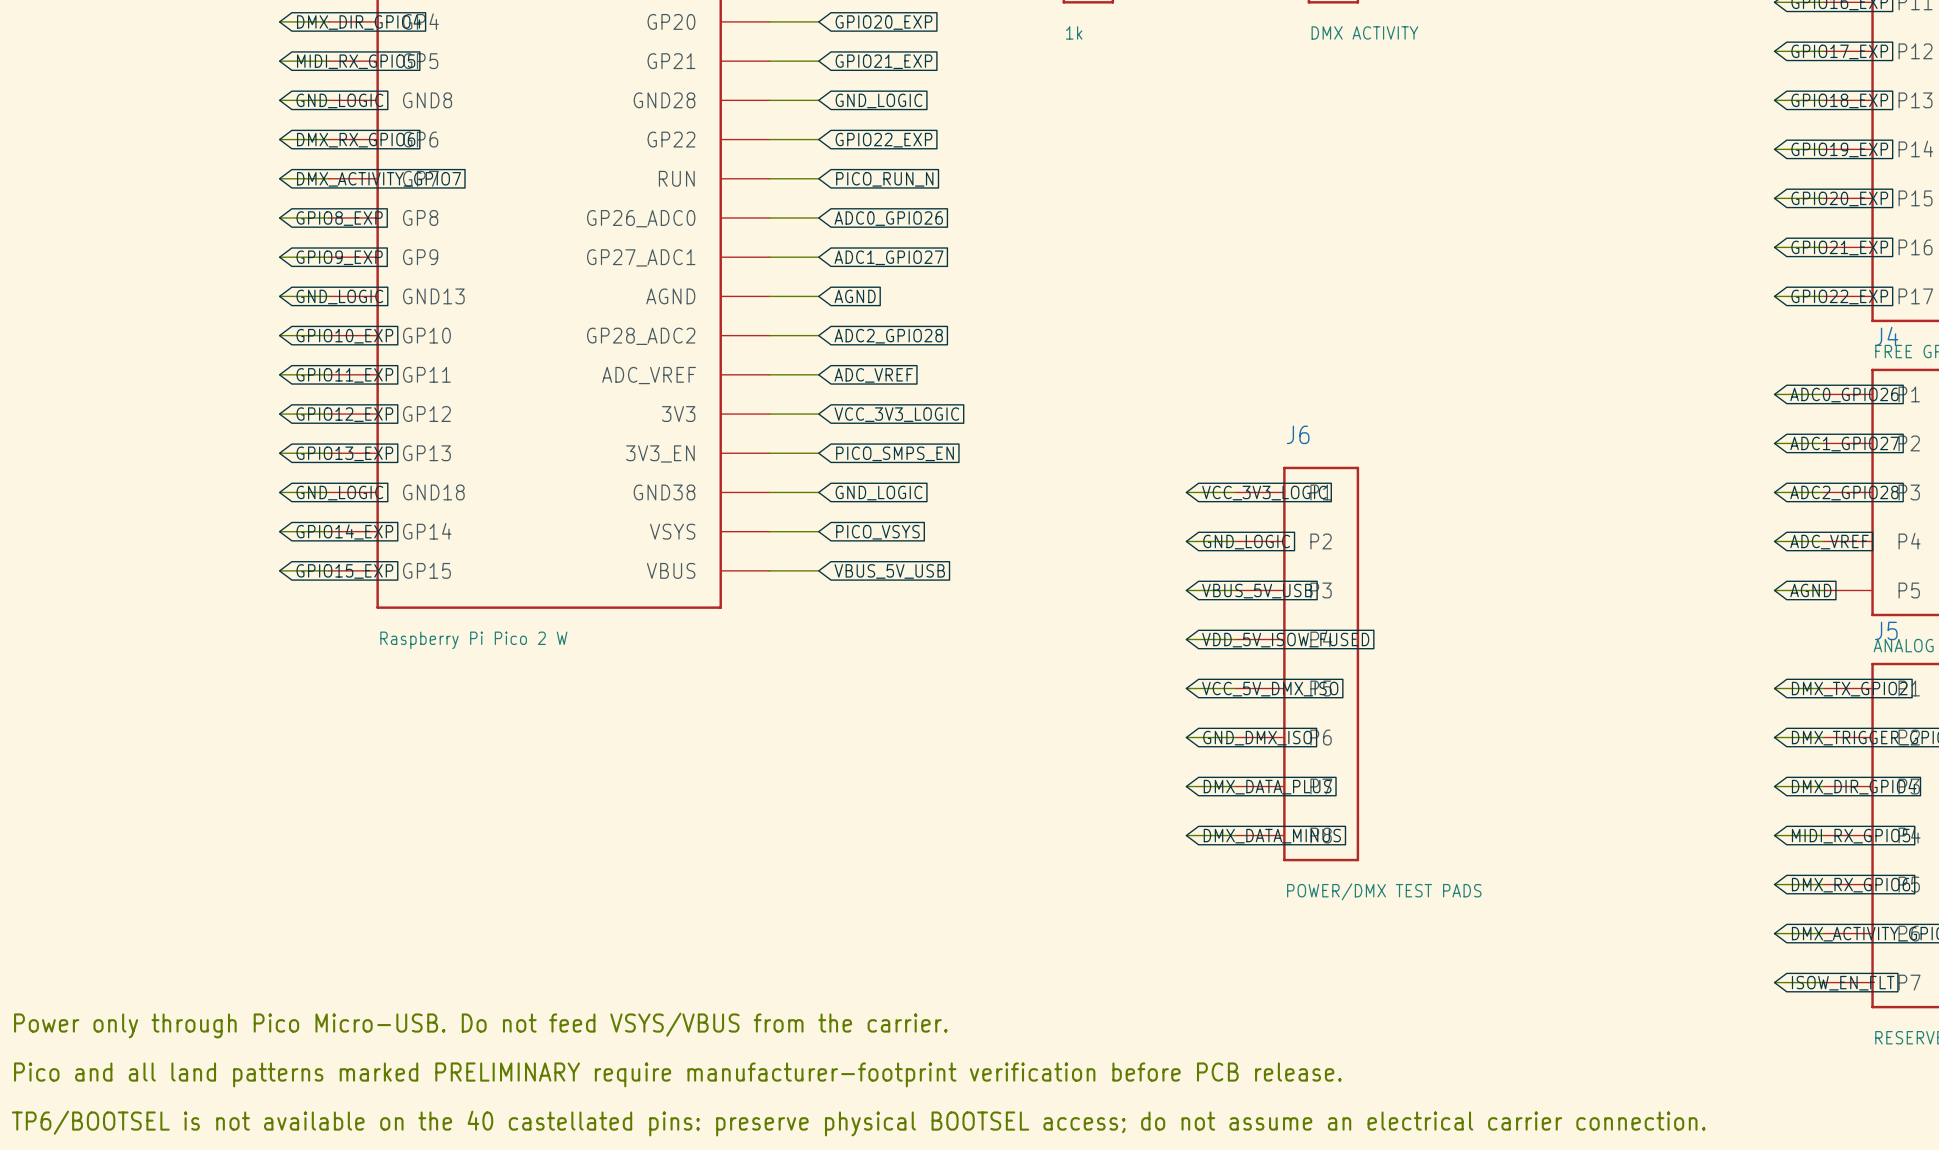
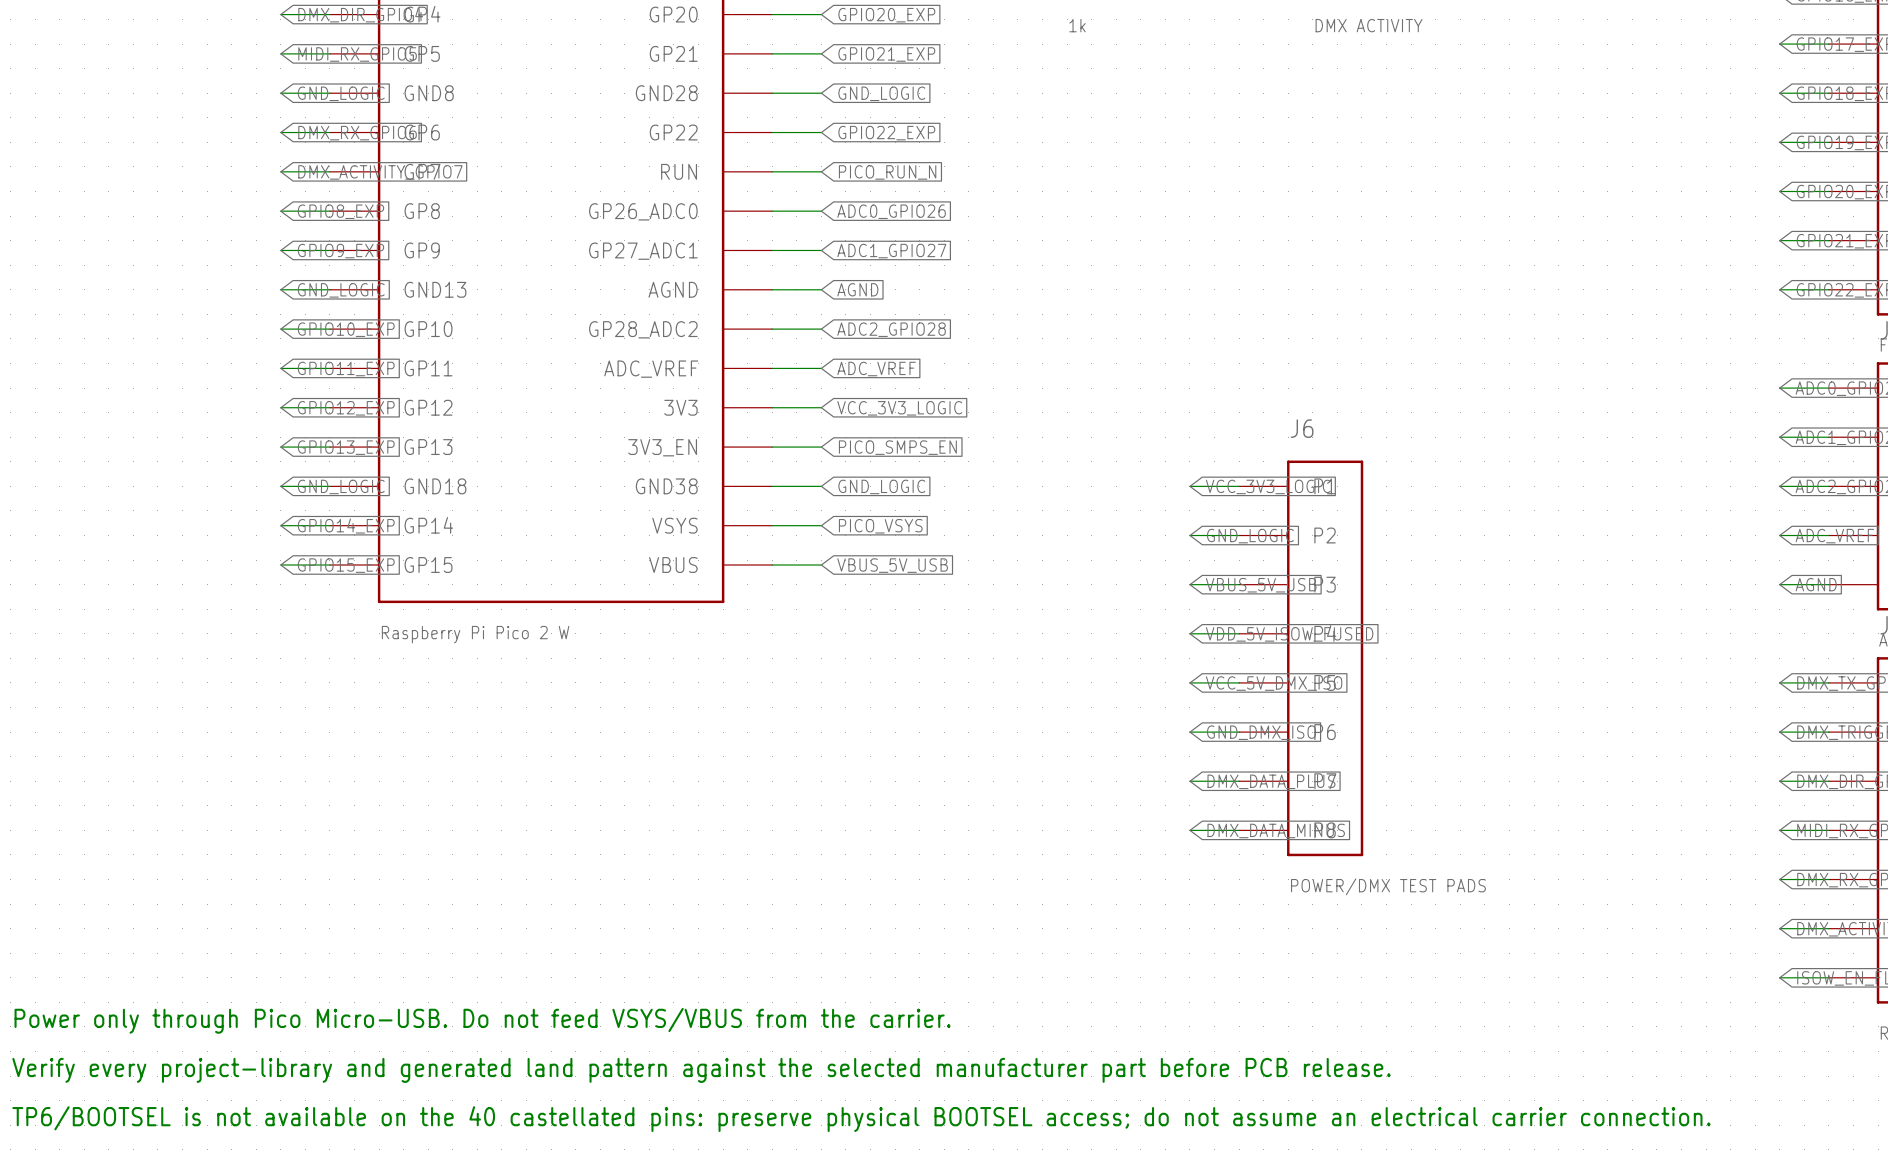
text: Pico and all land patterns marked PRELIMINARY require manufacturer-footprint verification before PCB release. (677, 1074) -> Verify every project-library and generated land pattern against the selected manufacturer part before PCB release. (701, 1070)

